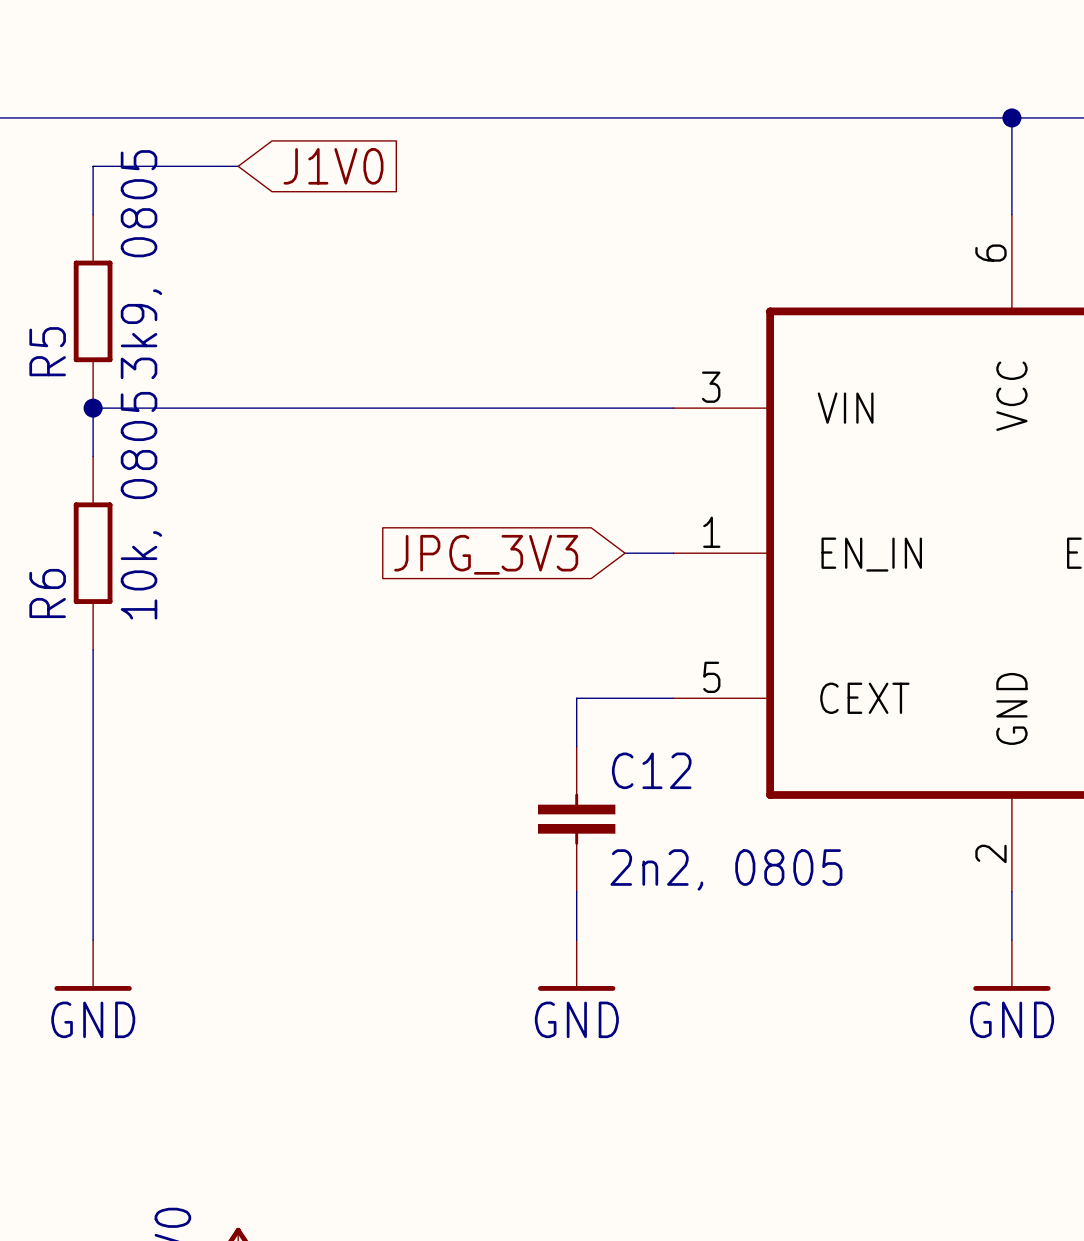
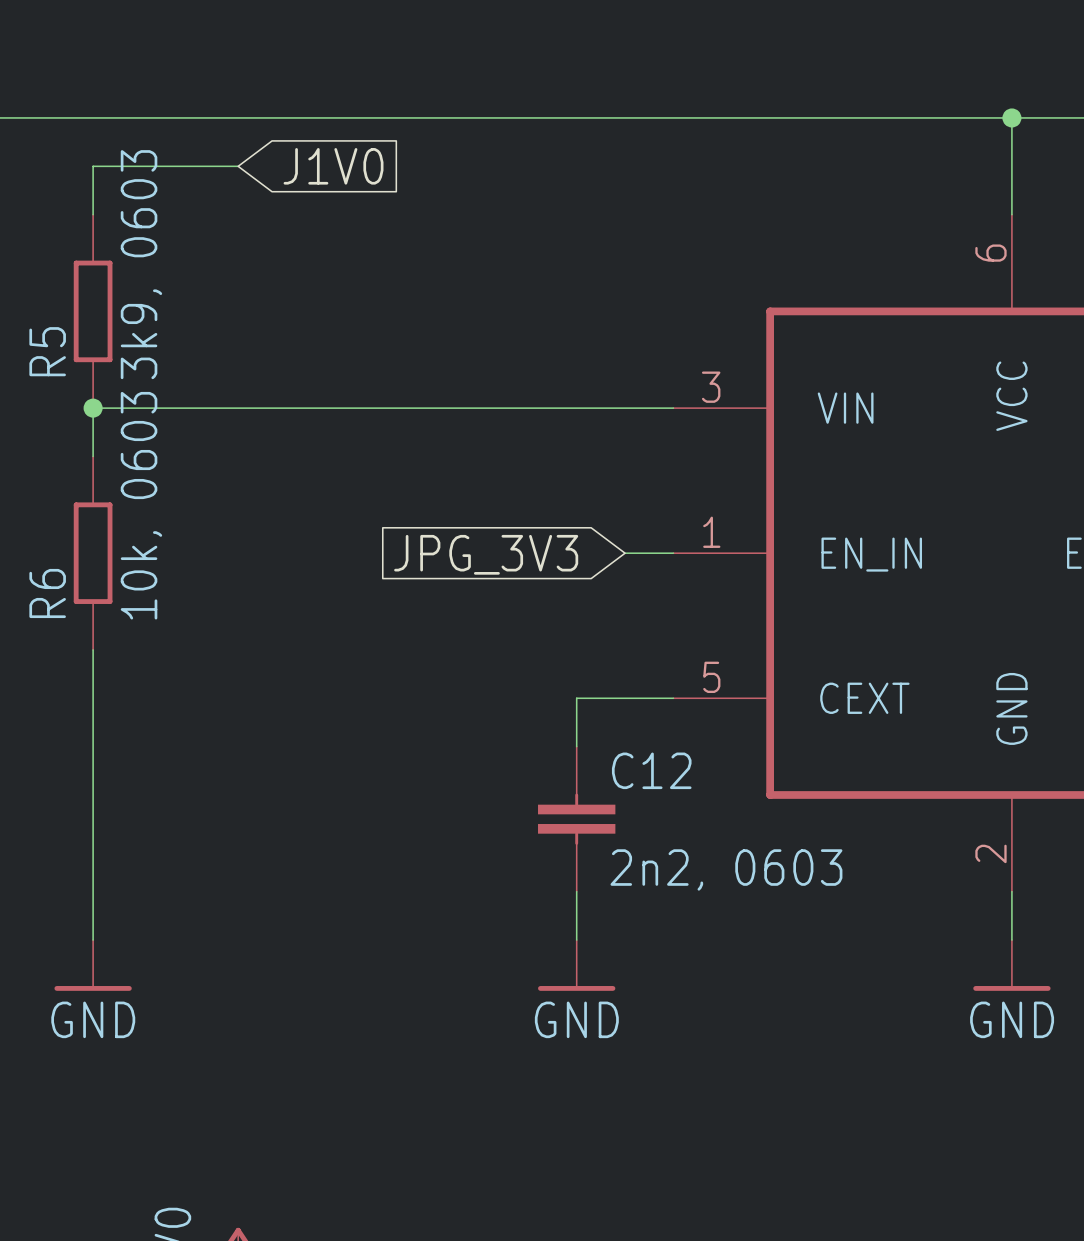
R5 value: 3k9, 0805 (141, 264) -> 3k9, 0603 (141, 264)
R6 value: 10k, 0805 (141, 505) -> 10k, 0603 (141, 505)
C12 value: 2n2, 0805 (726, 869) -> 2n2, 0603 (726, 869)

